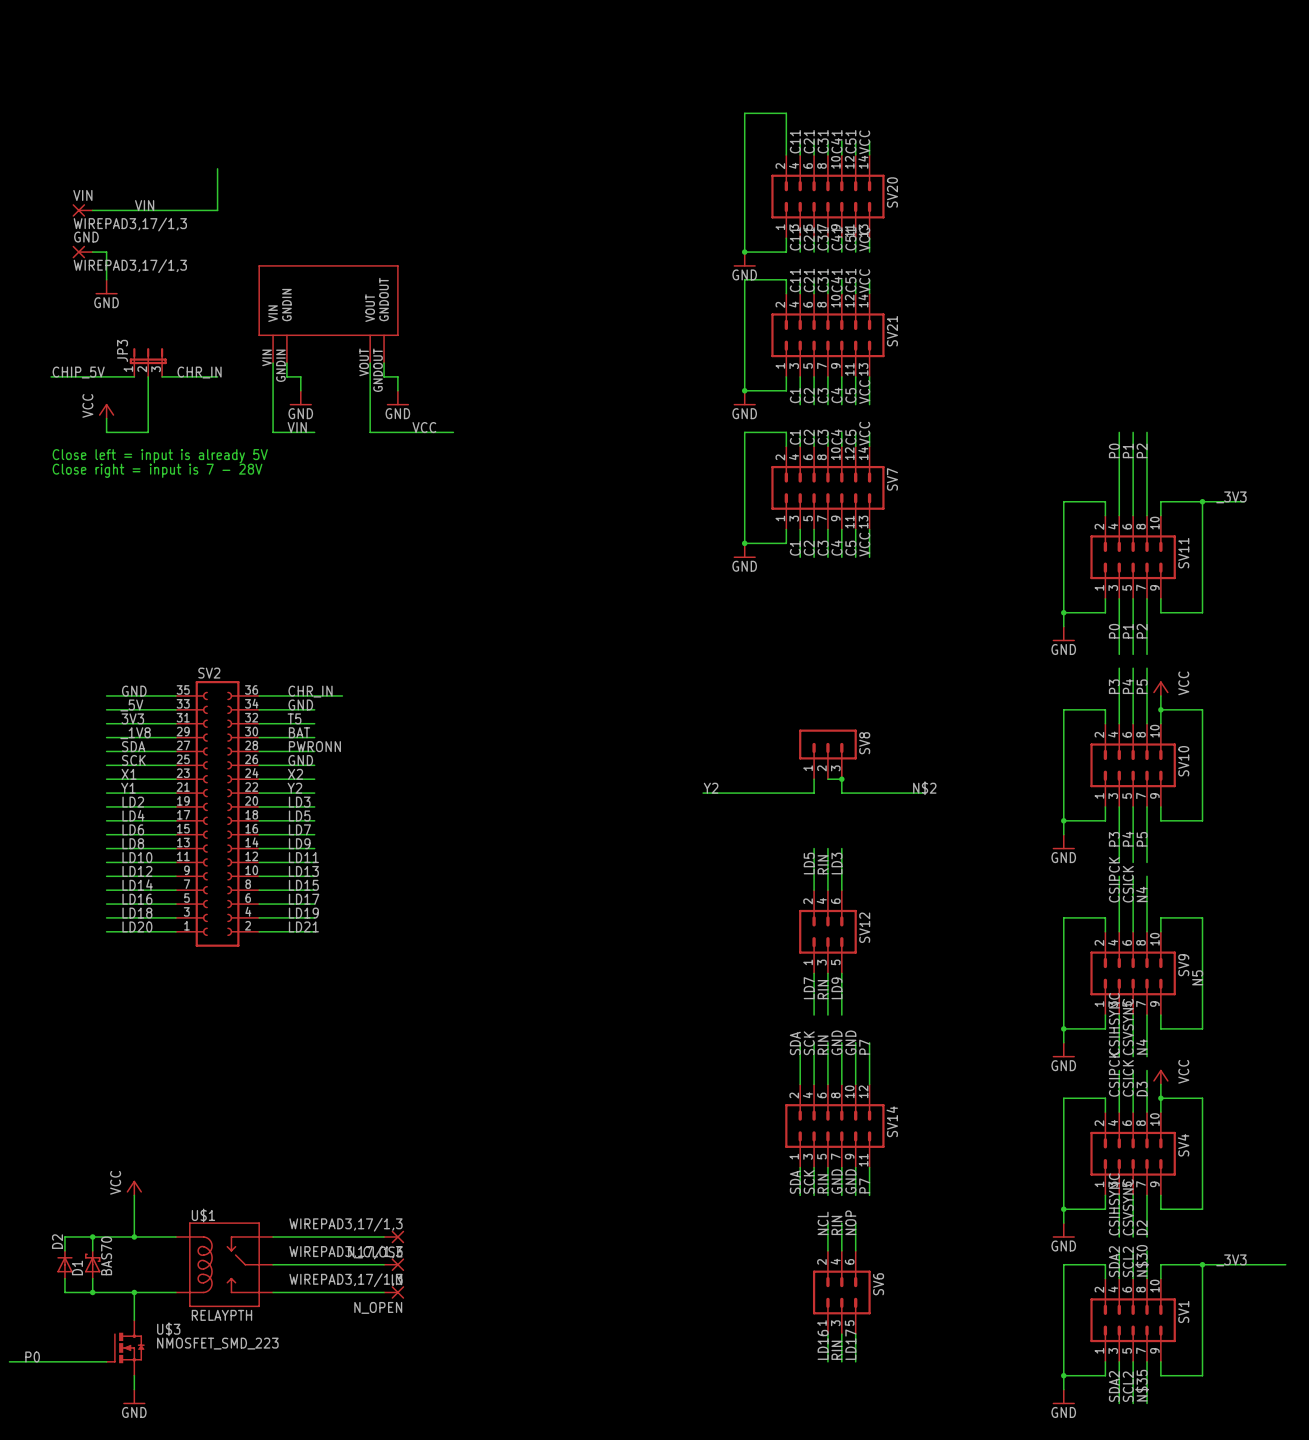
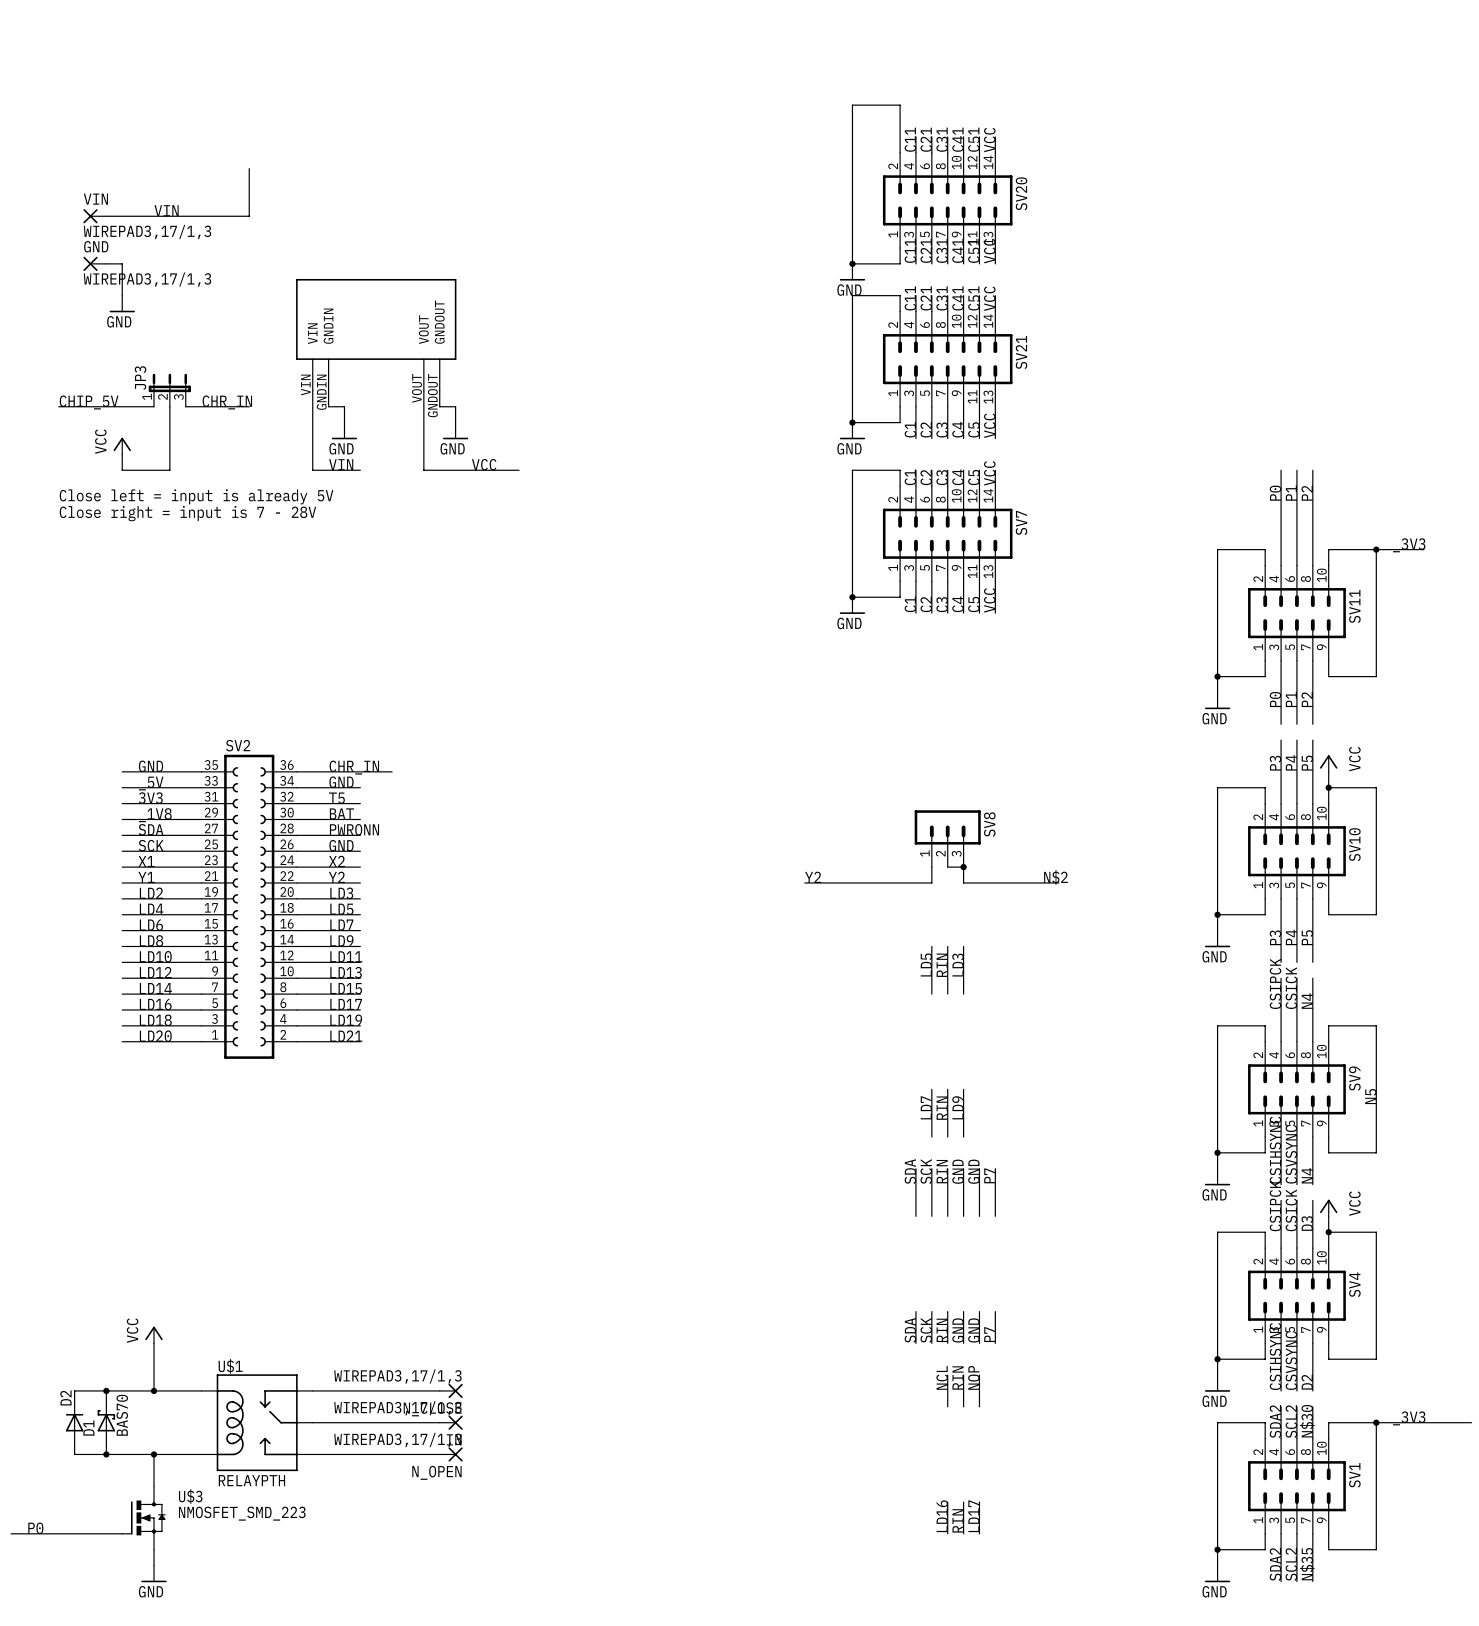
SV12: (827, 931) -> none
SV14: (834, 1126) -> none
SV6: (841, 1292) -> none

